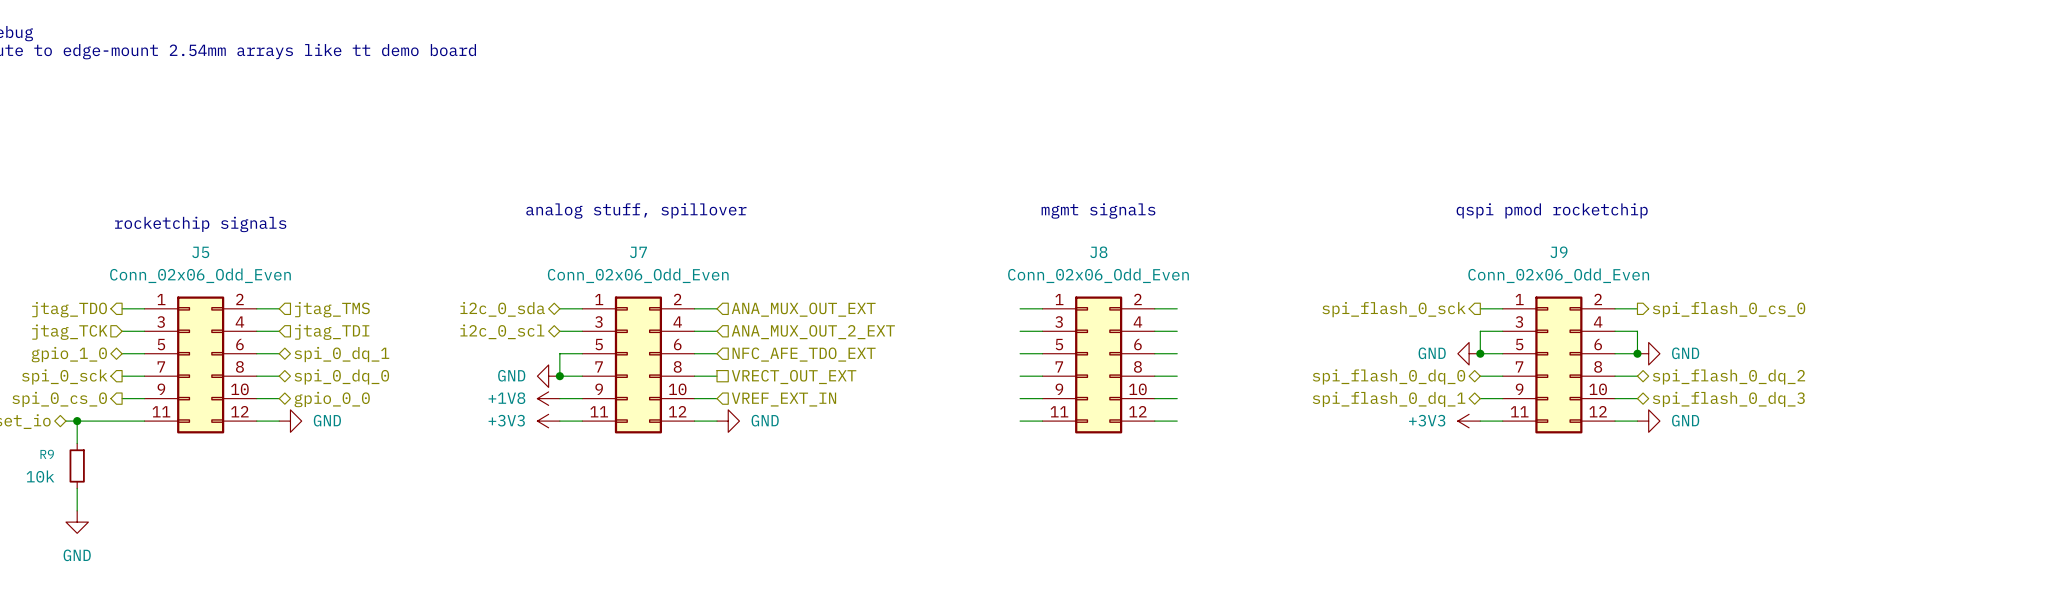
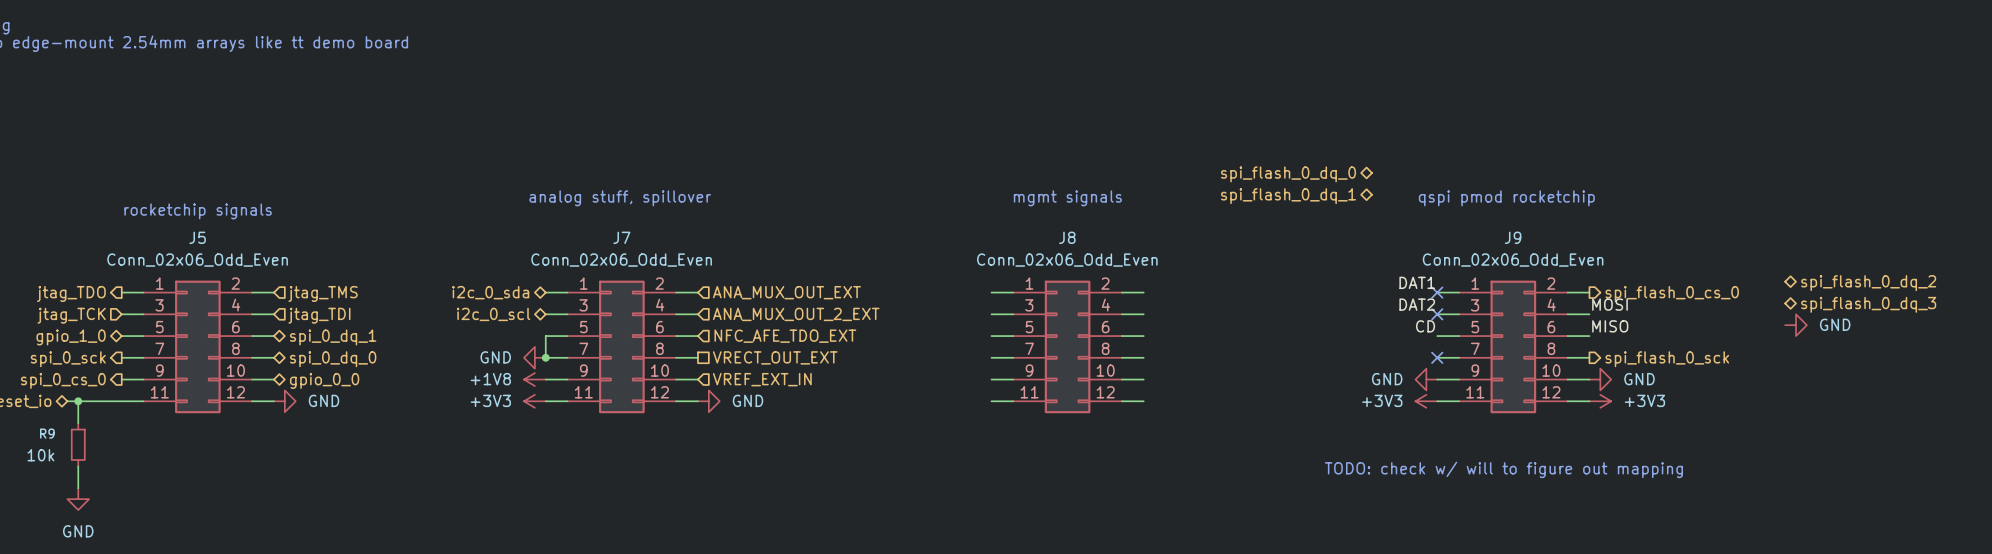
label: none -> DAT1 (1417, 282)
hierarchical label: none -> spi_flash_0_dq_2 (1868, 283)
no-connect mark: none -> (1437, 292)
hierarchical label: spi_flash_0_sck (1394, 309) -> none
label: none -> DAT2 (1417, 304)
label: none -> MOSI (1609, 304)
wire: (1480, 331) (1480, 353) -> none
no-connect mark: none -> (1437, 314)
wire: (1637, 331) (1637, 353) -> none
power symbol: none -> GND (1796, 325)
label: none -> CD (1425, 326)
label: none -> MISO (1610, 326)
power symbol position: GND (1469, 353) -> GND (1426, 379)
junction: (1480, 353) -> none
junction: (1637, 353) -> none
power symbol position: GND (1648, 353) -> GND (1600, 379)
hierarchical label position: spi_flash_0_dq_0 (1388, 376) -> spi_flash_0_dq_0 (1288, 174)
no-connect mark: none -> (1437, 357)
hierarchical label shape: bidirectional (1728, 376) -> output (1667, 359)
hierarchical label: spi_flash_0_dq_2 (1728, 376) -> spi_flash_0_sck (1667, 359)
hierarchical label position: spi_flash_0_dq_1 (1389, 399) -> spi_flash_0_dq_1 (1288, 196)
hierarchical label position: spi_flash_0_dq_3 (1728, 399) -> spi_flash_0_dq_3 (1868, 304)
power symbol: GND (1648, 421) -> +3V3 (1600, 401)
text: none -> TODO: check w/ will to figure out mapping (1503, 469)

